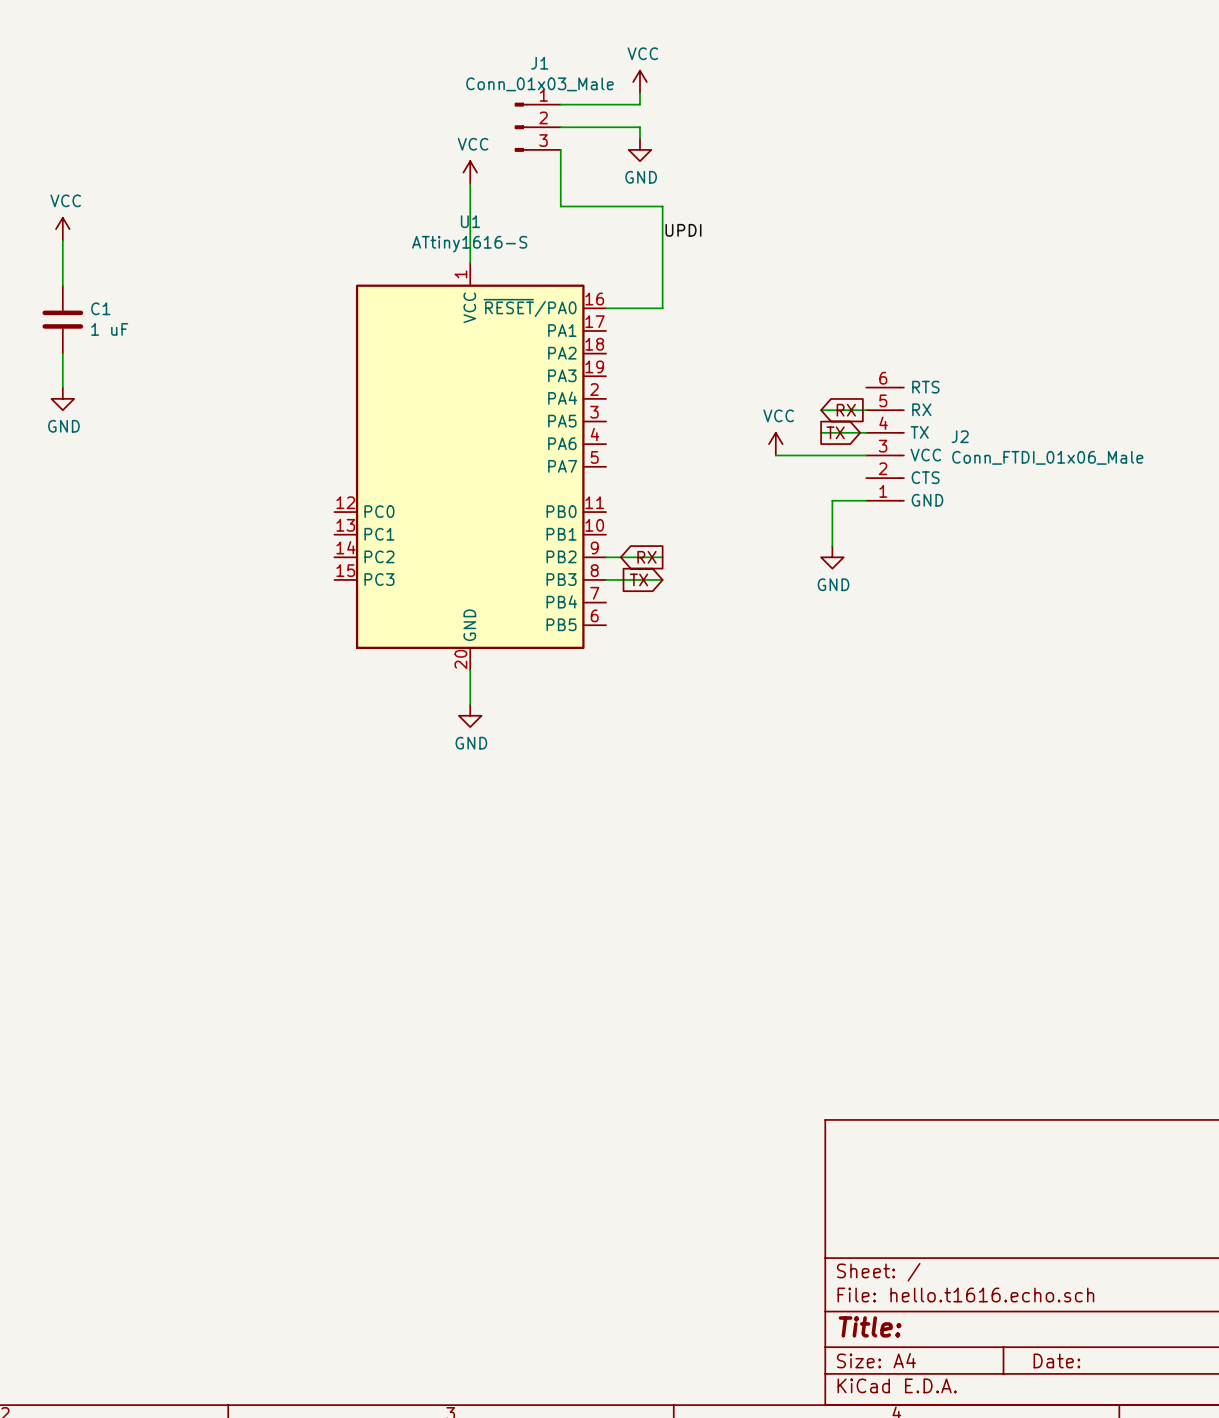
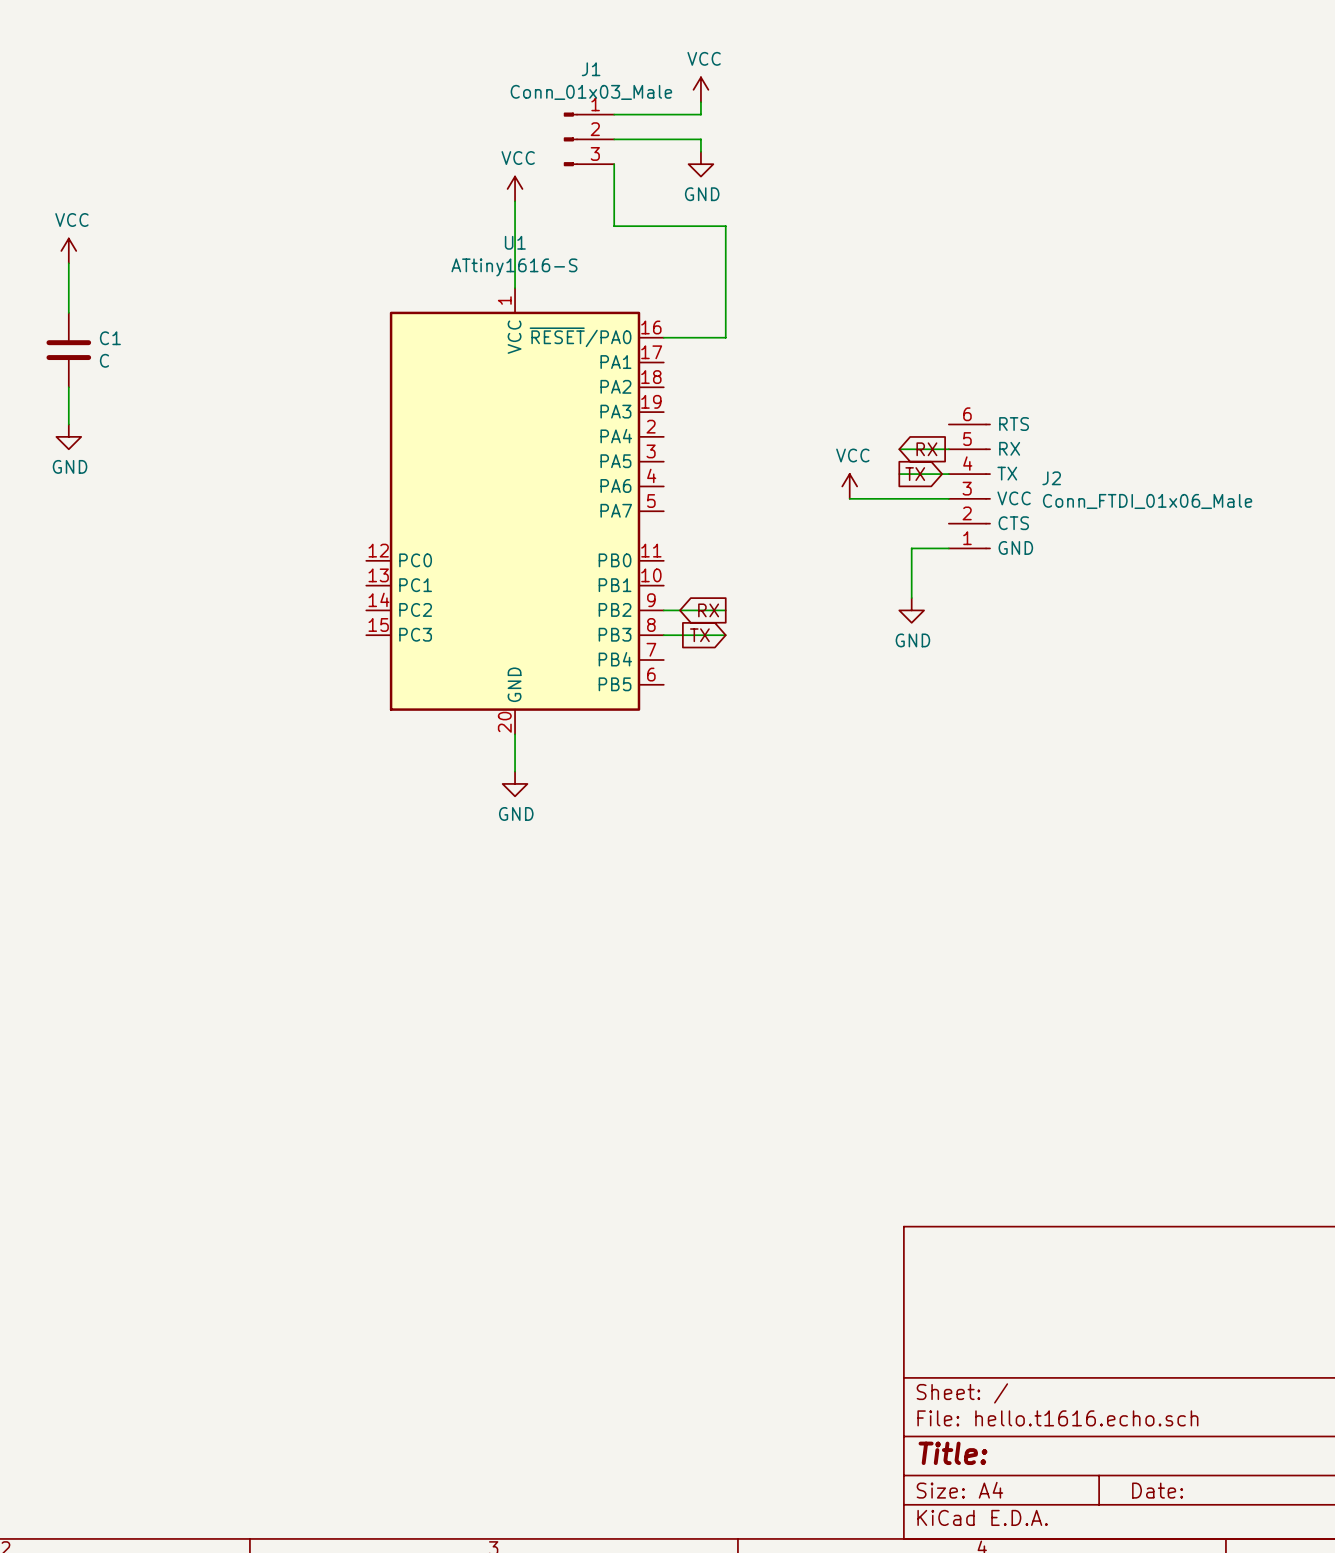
label: UPDI (683, 230) -> none
C1 value: 1 uF (109, 329) -> C (104, 360)

